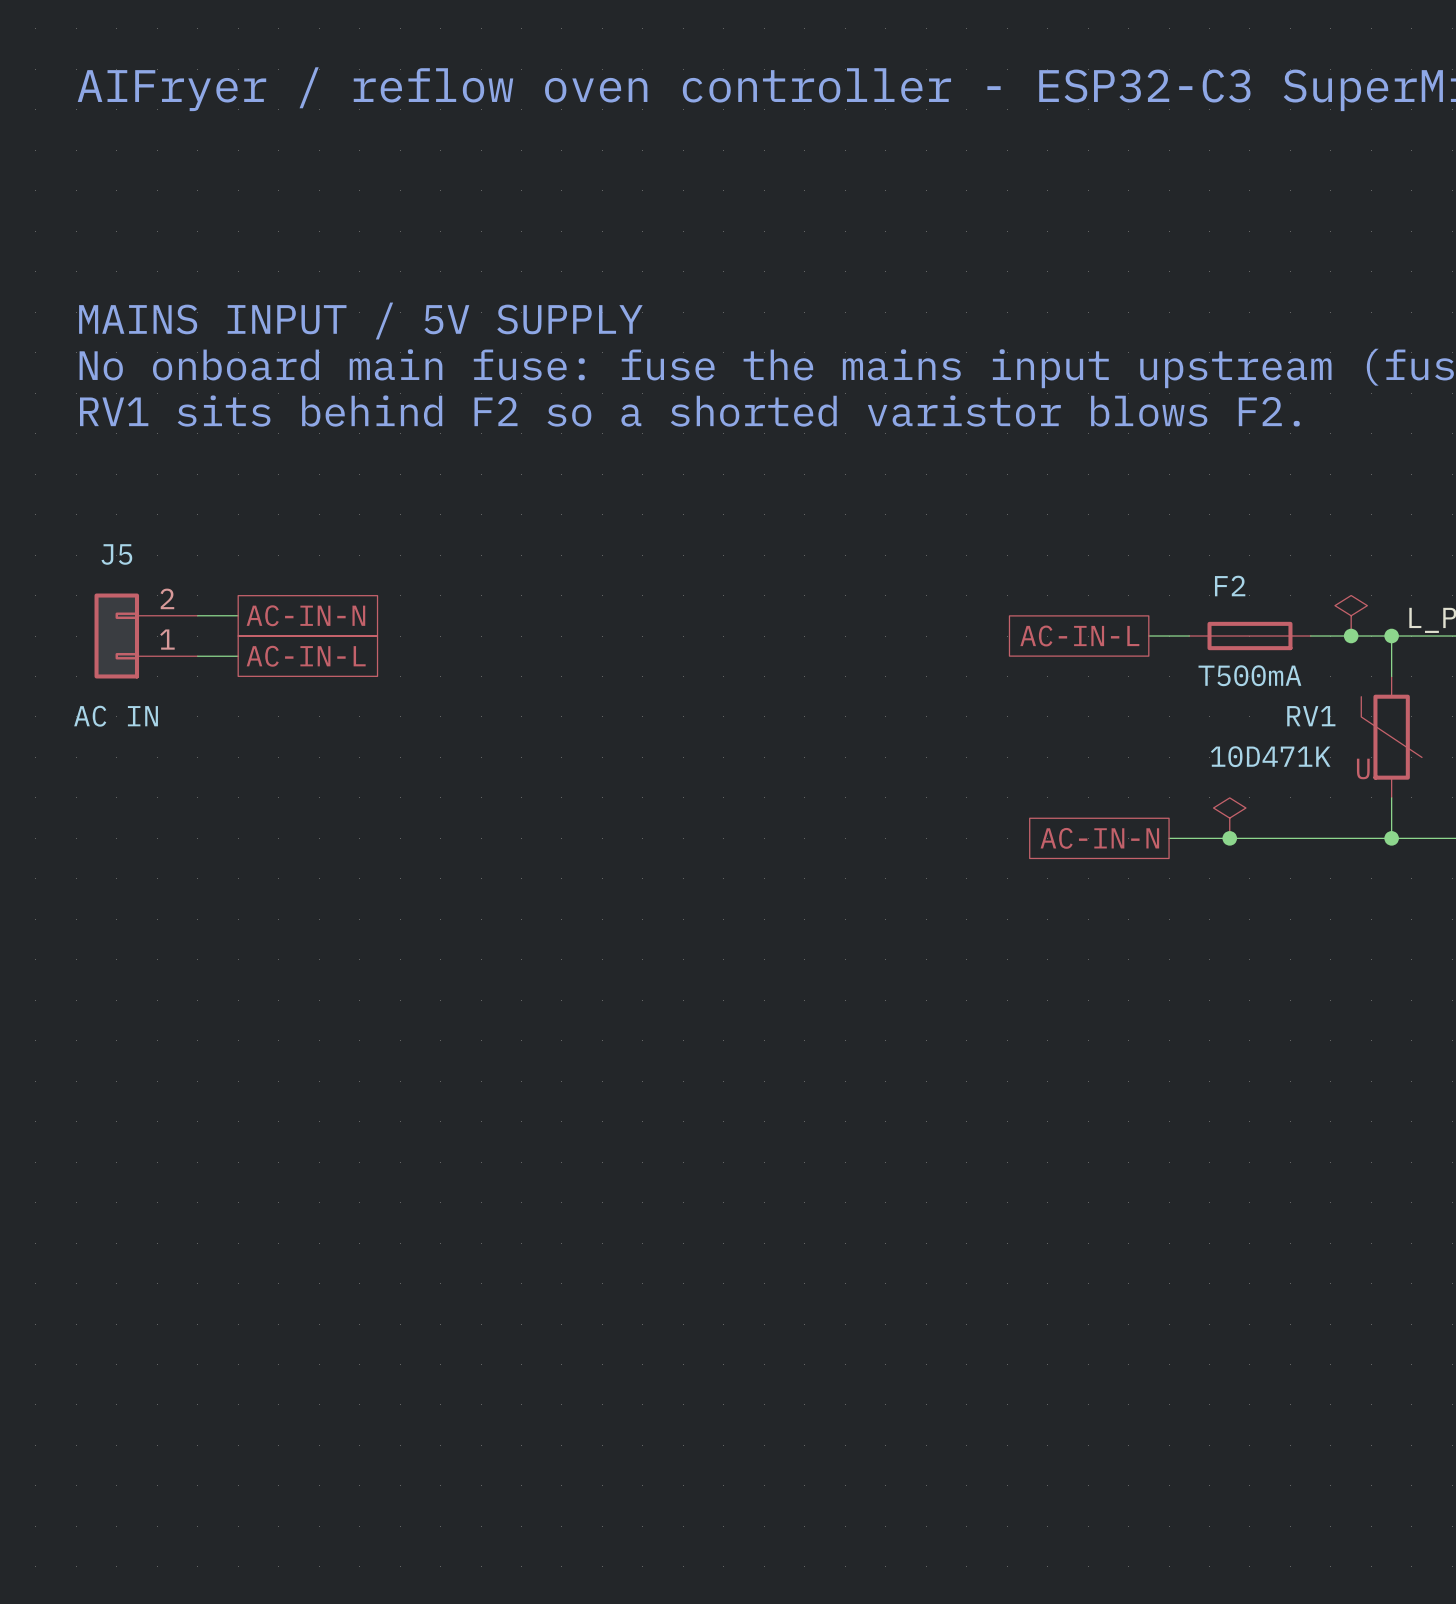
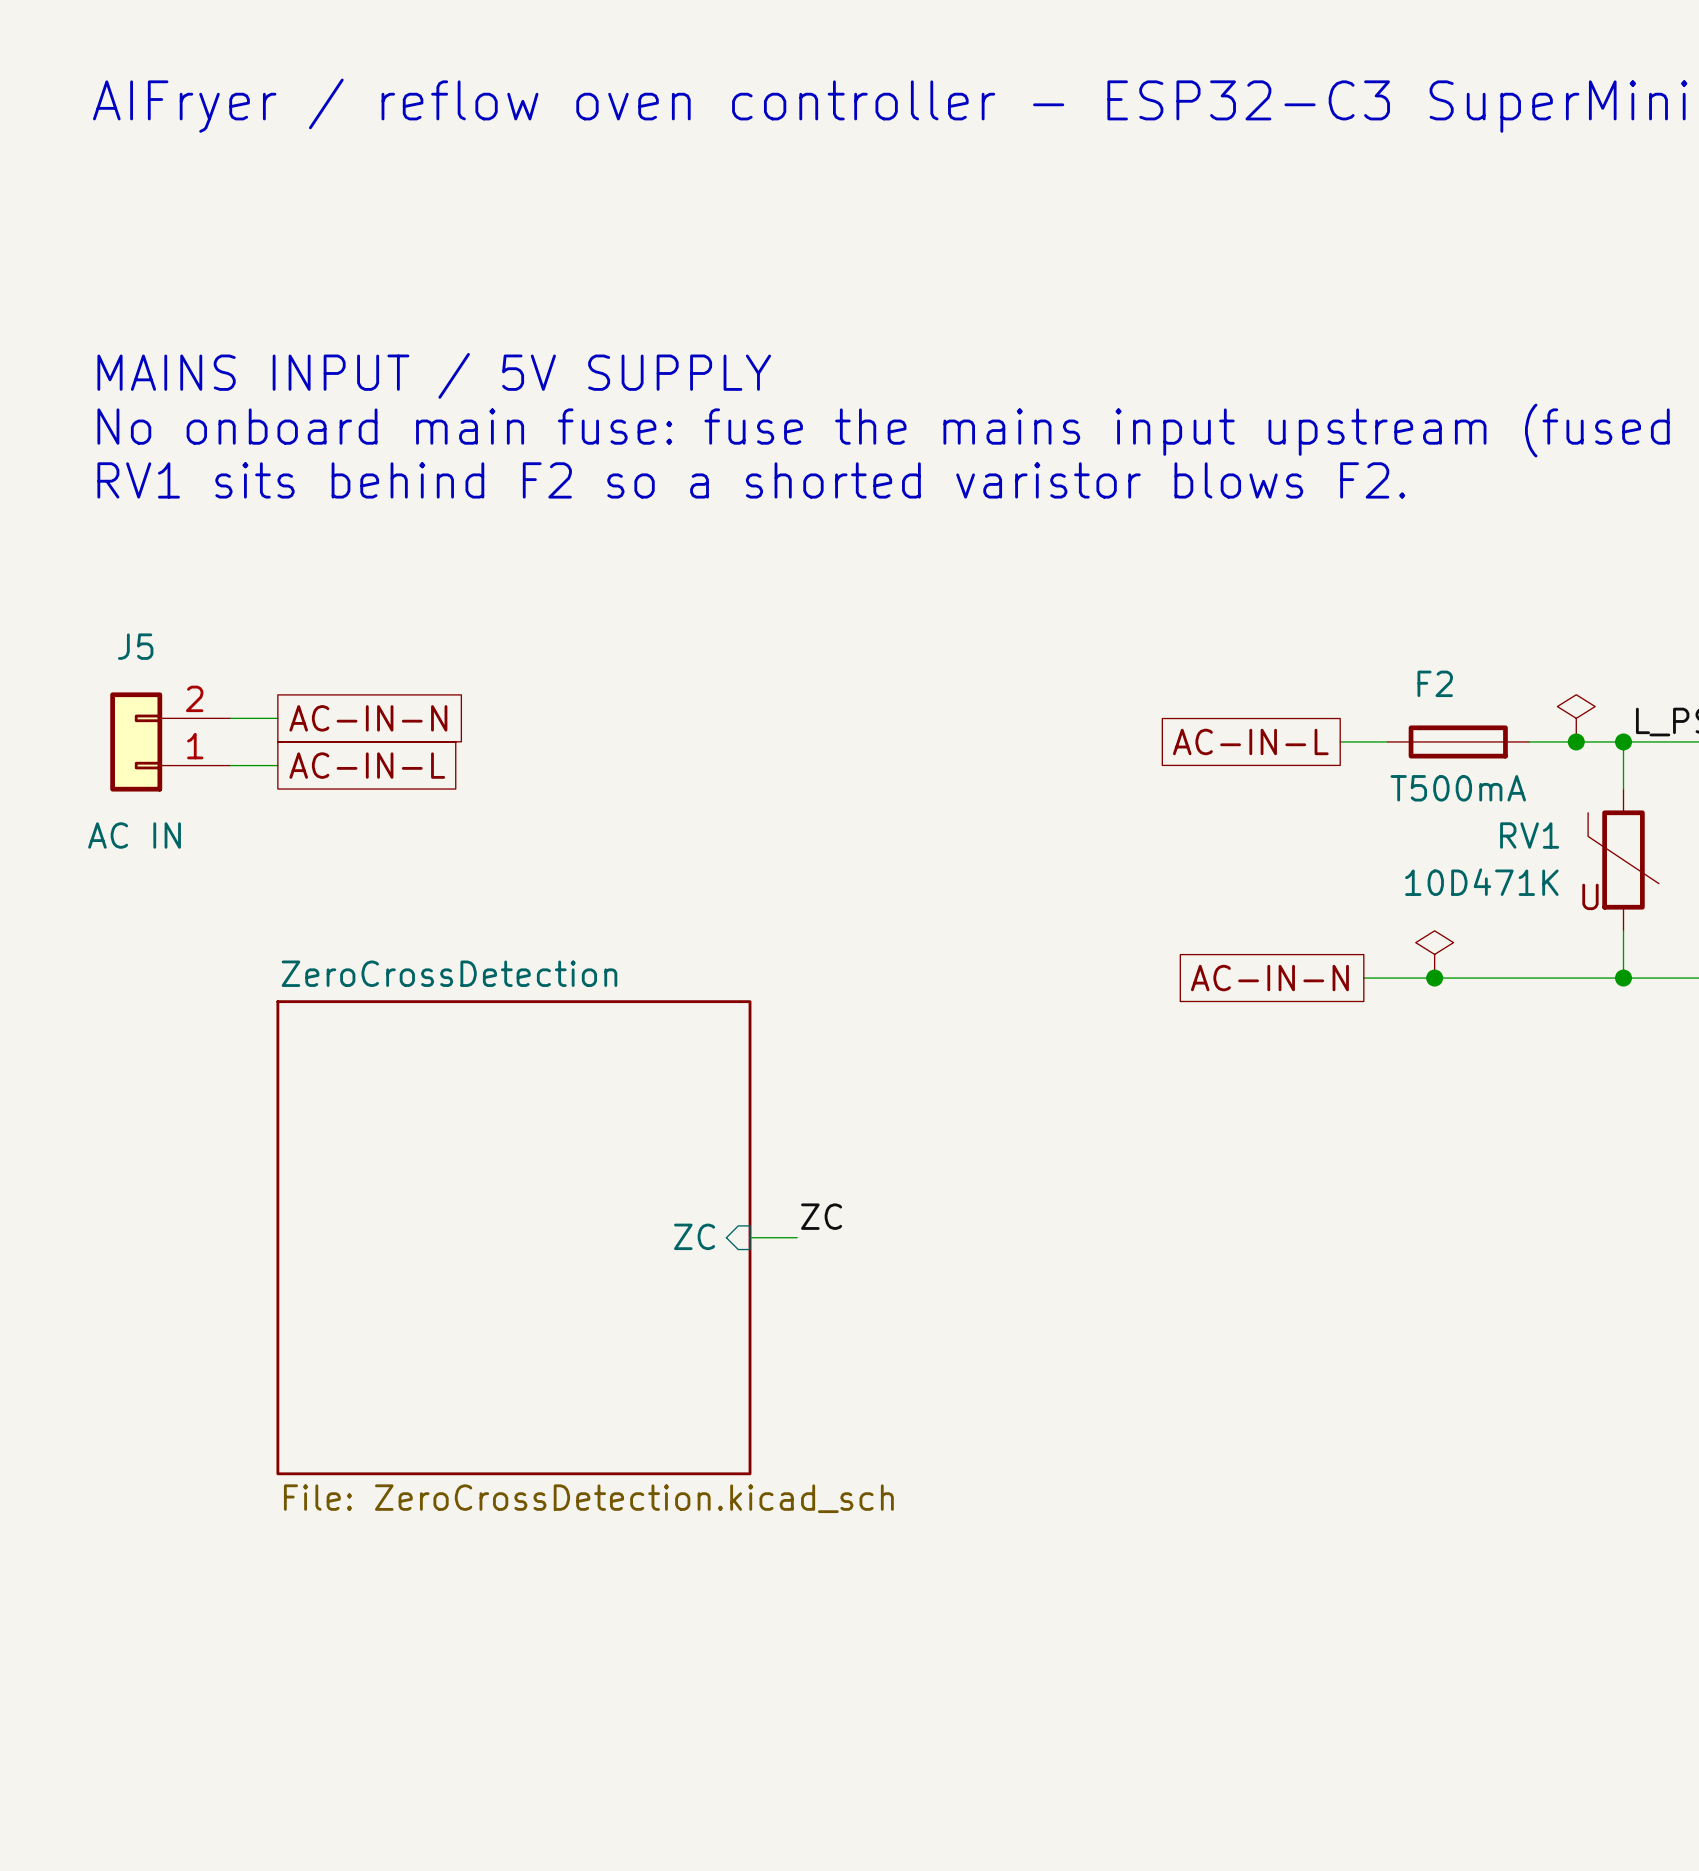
label: none -> ZC (821, 1216)
sheet ZeroCrossDetection: none -> File: ZeroCrossDetection.kicad_sch (513, 1237)
sheet pin: none -> ZC (694, 1236)
wire: none -> (750, 1237) (797, 1237)

